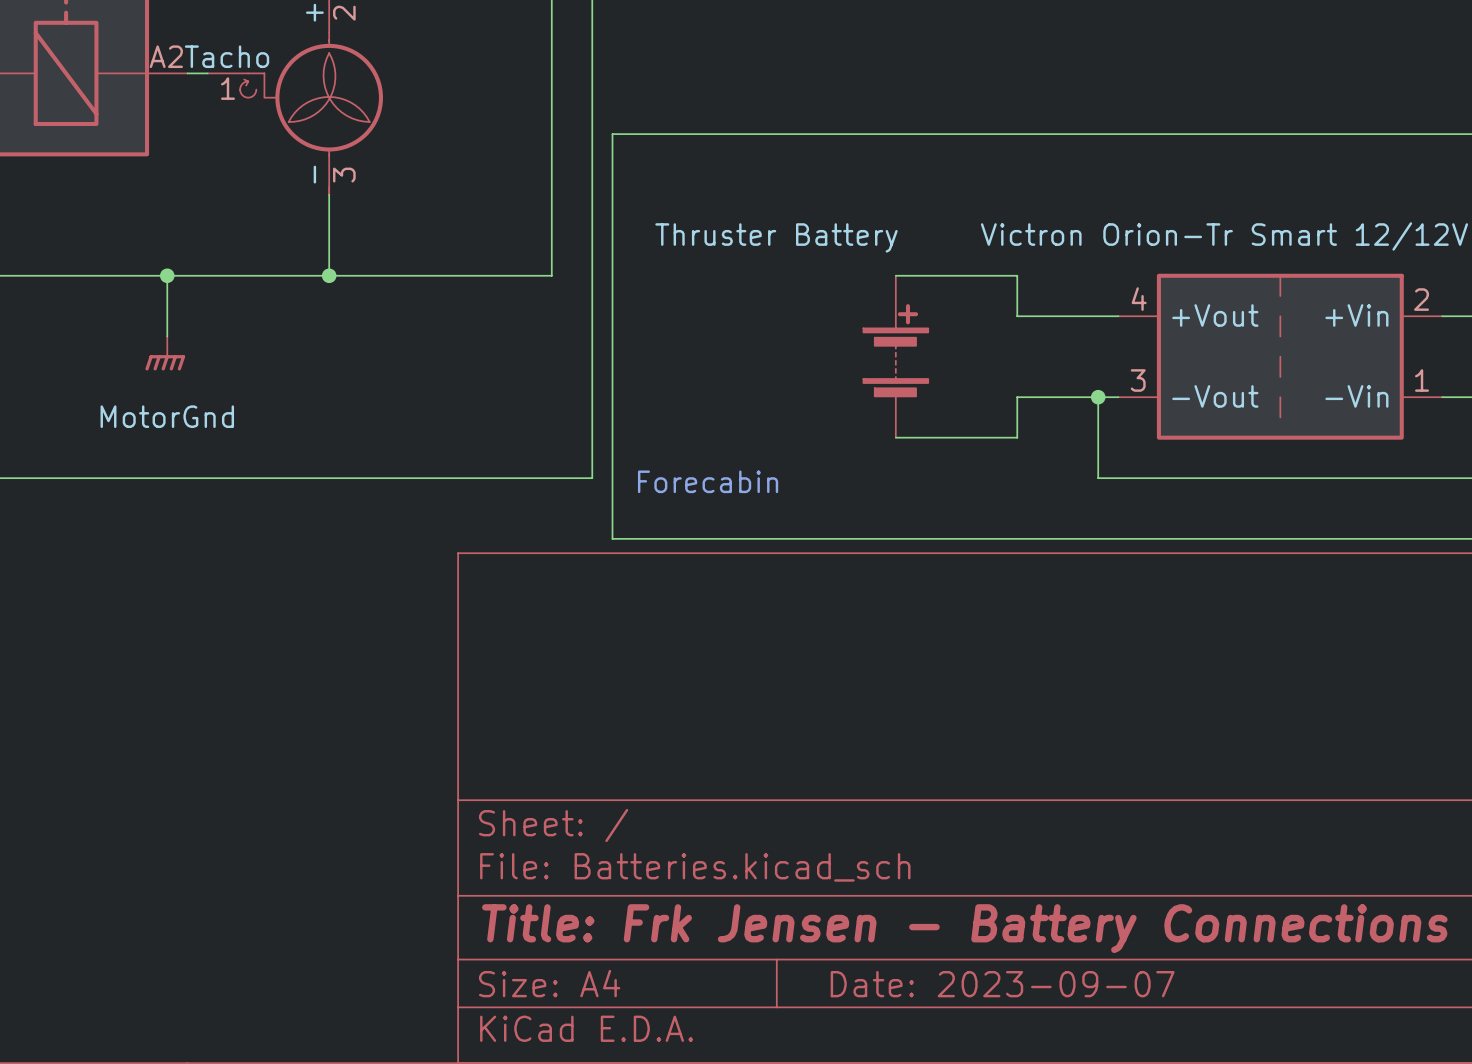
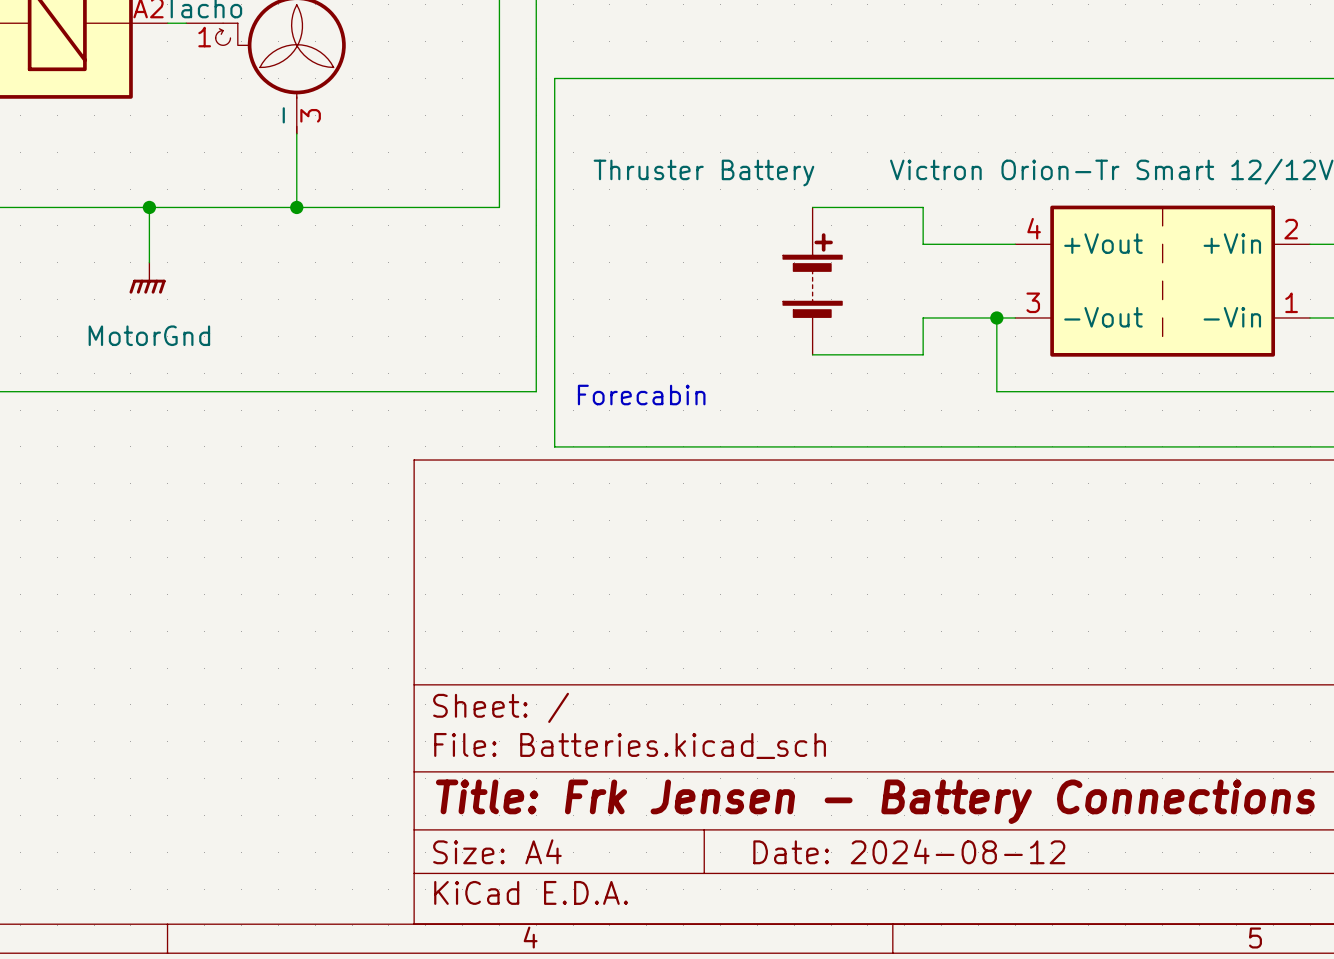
title block: Date: 2023-09-07 (1002, 984) -> Date: 2024-08-12 (909, 851)

